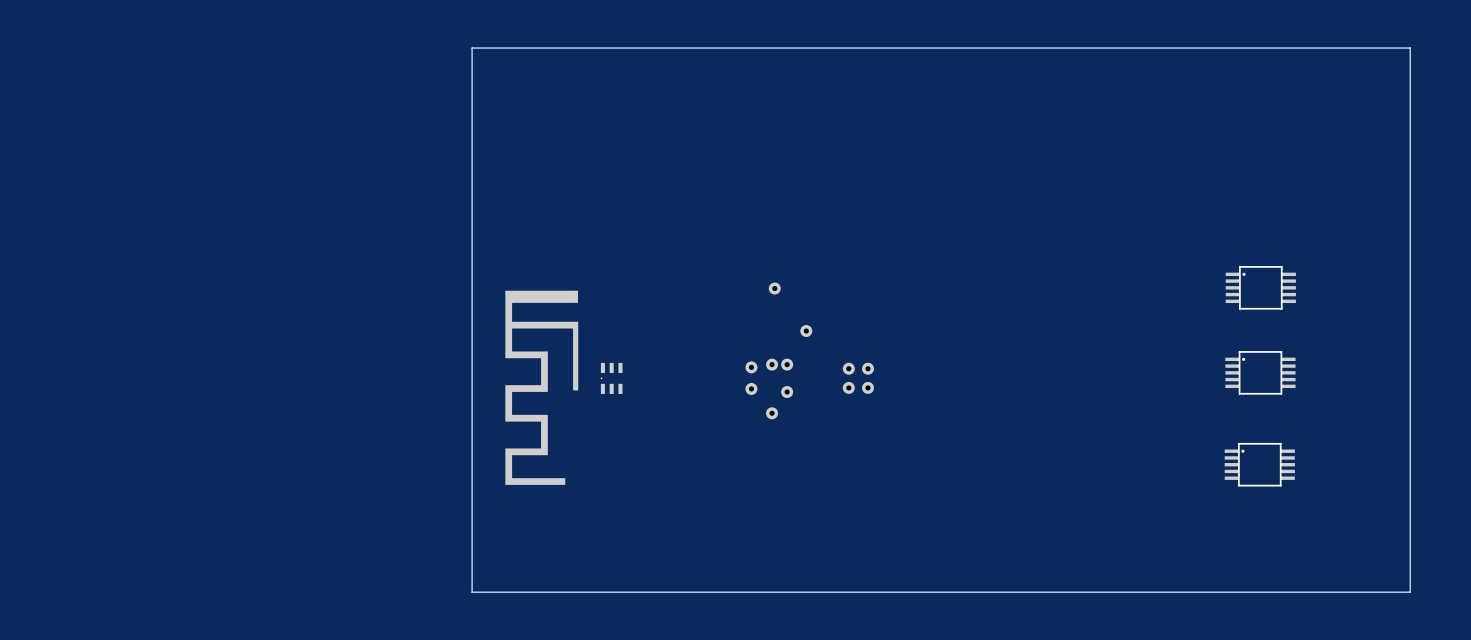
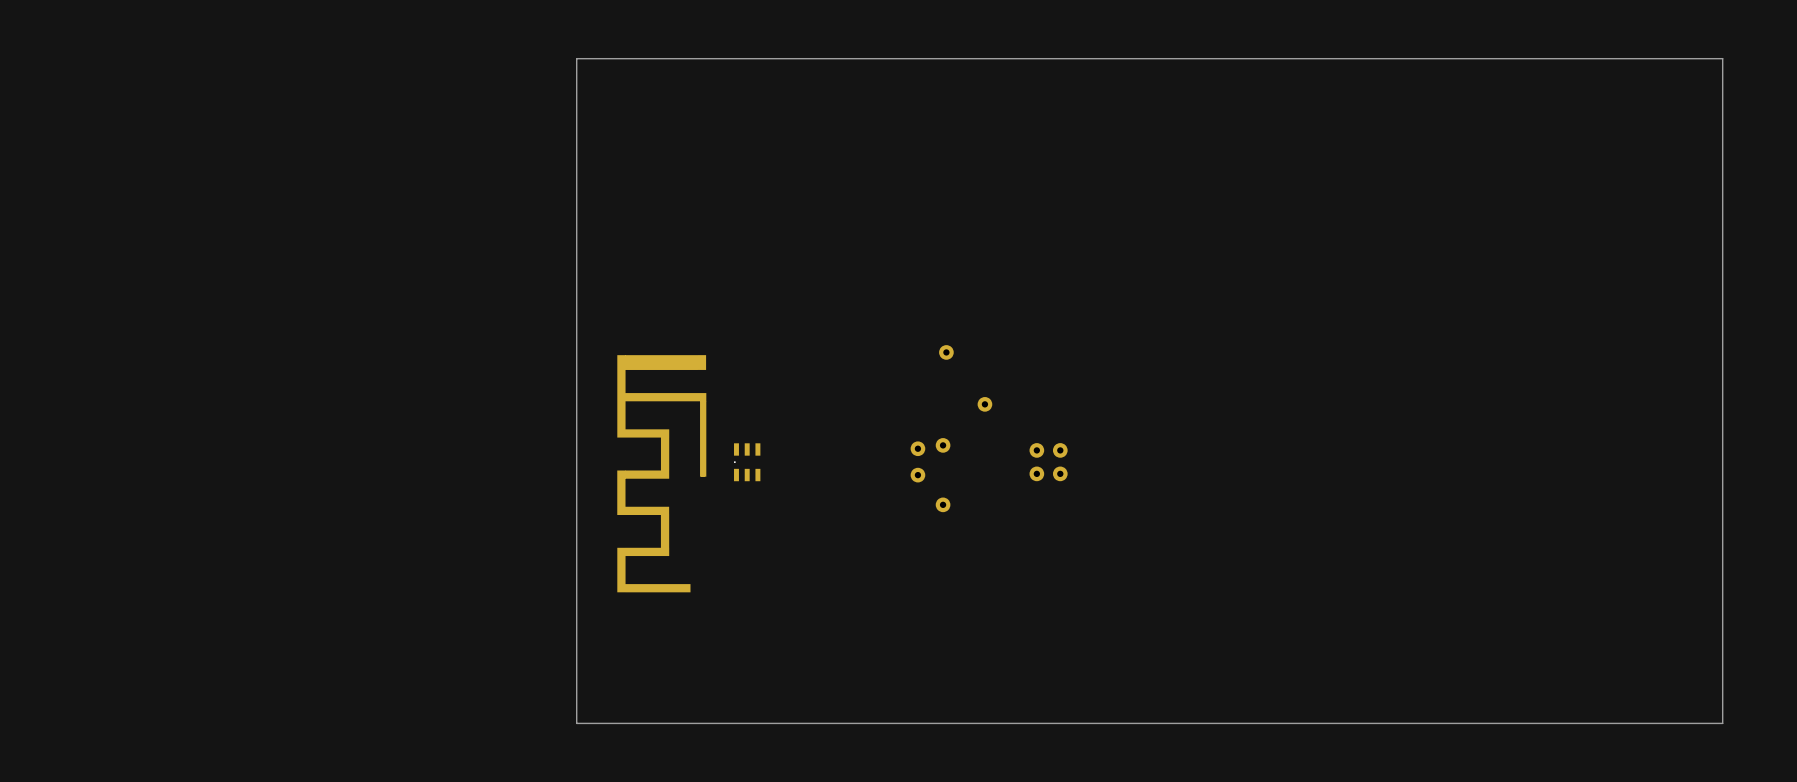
part: (1260, 287) -> none
part: (787, 364) -> none
part: (1260, 372) -> none
part: (787, 392) -> none
part: (1259, 464) -> none

